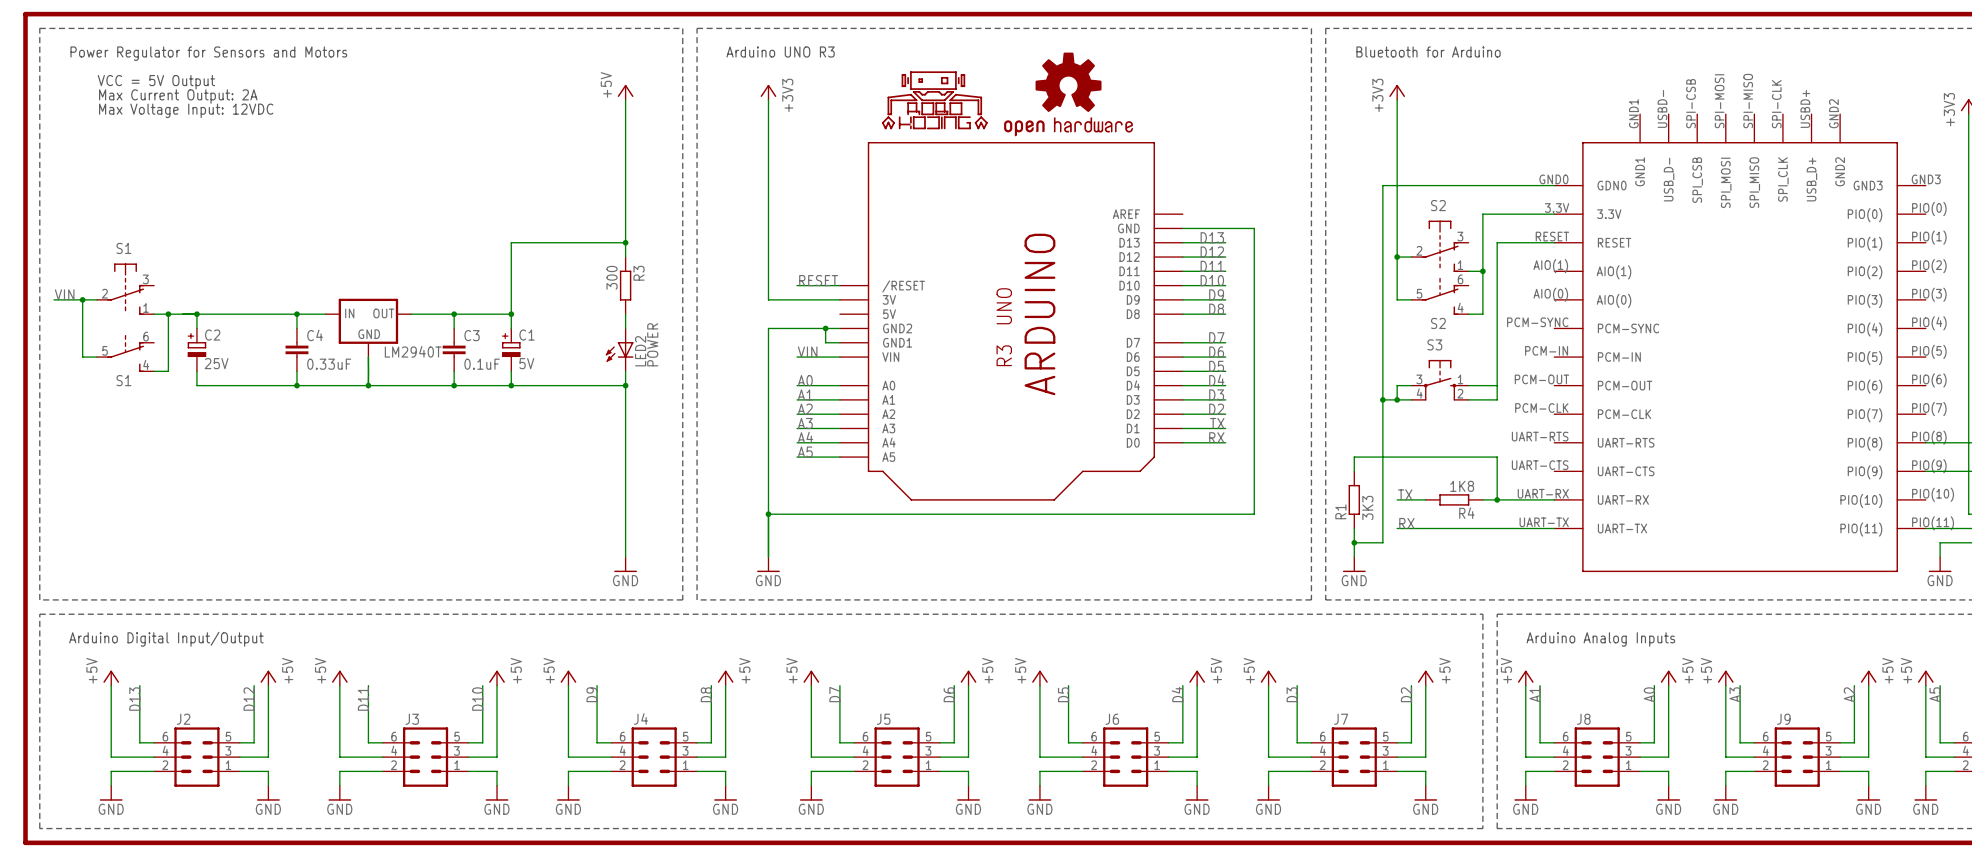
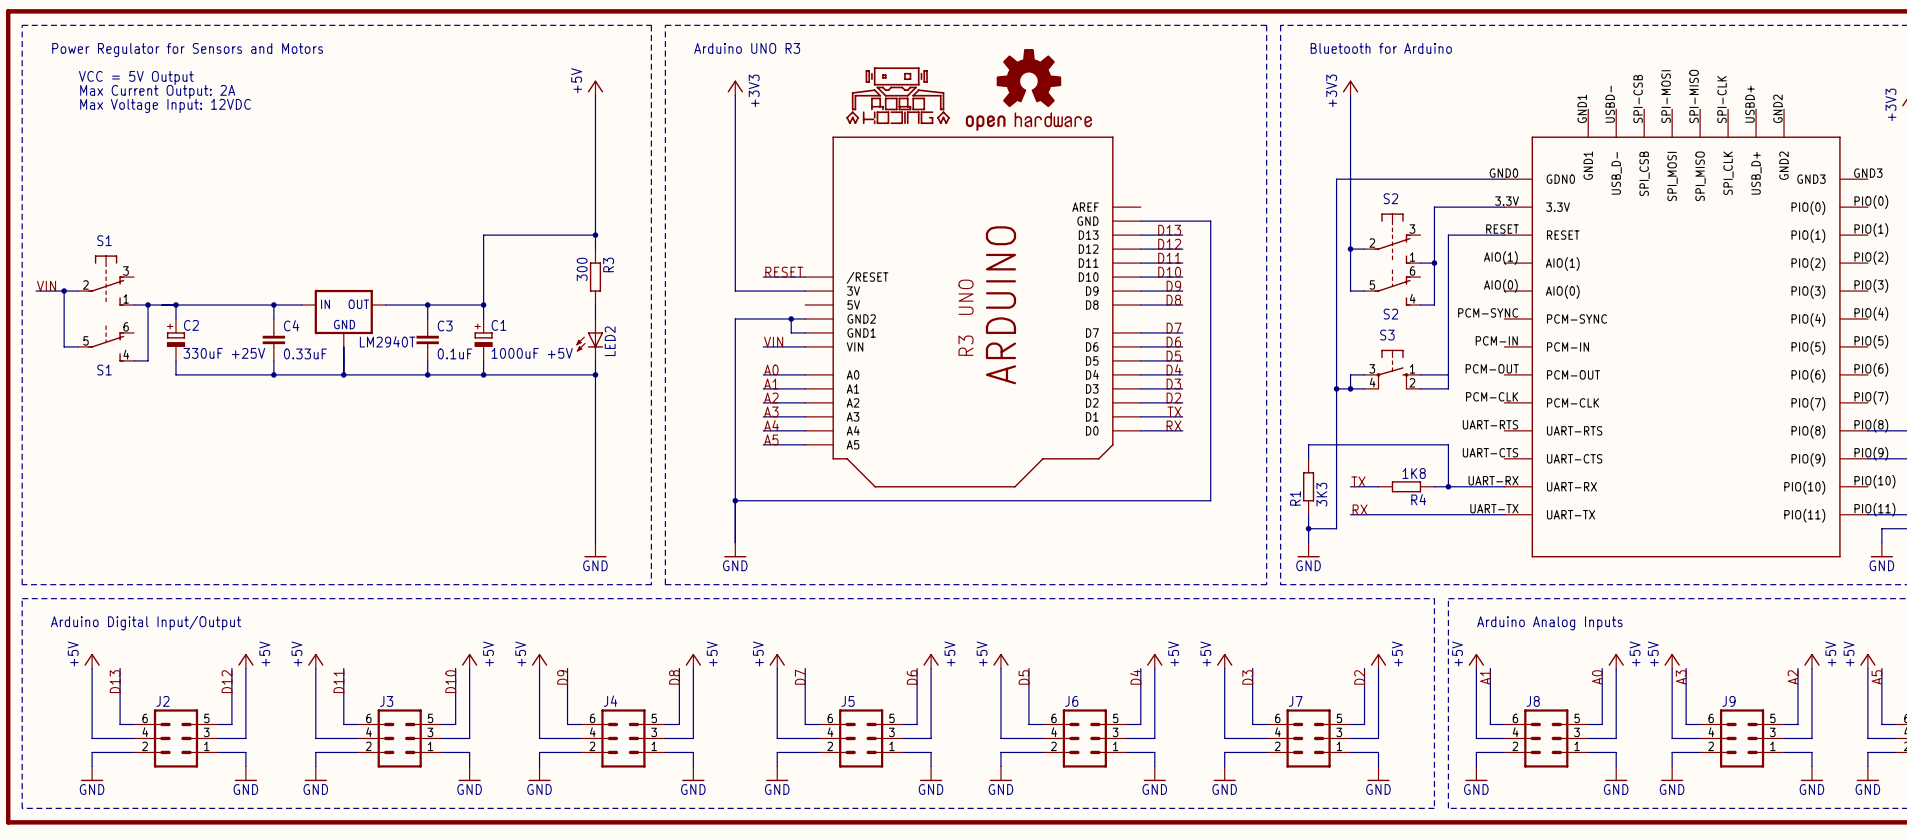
LED2 value: POWER (652, 344) -> none
C2 value: 25V (216, 363) -> 330uF +25V (224, 353)
C1 value: 5V (526, 363) -> 1000uF +5V (532, 353)

